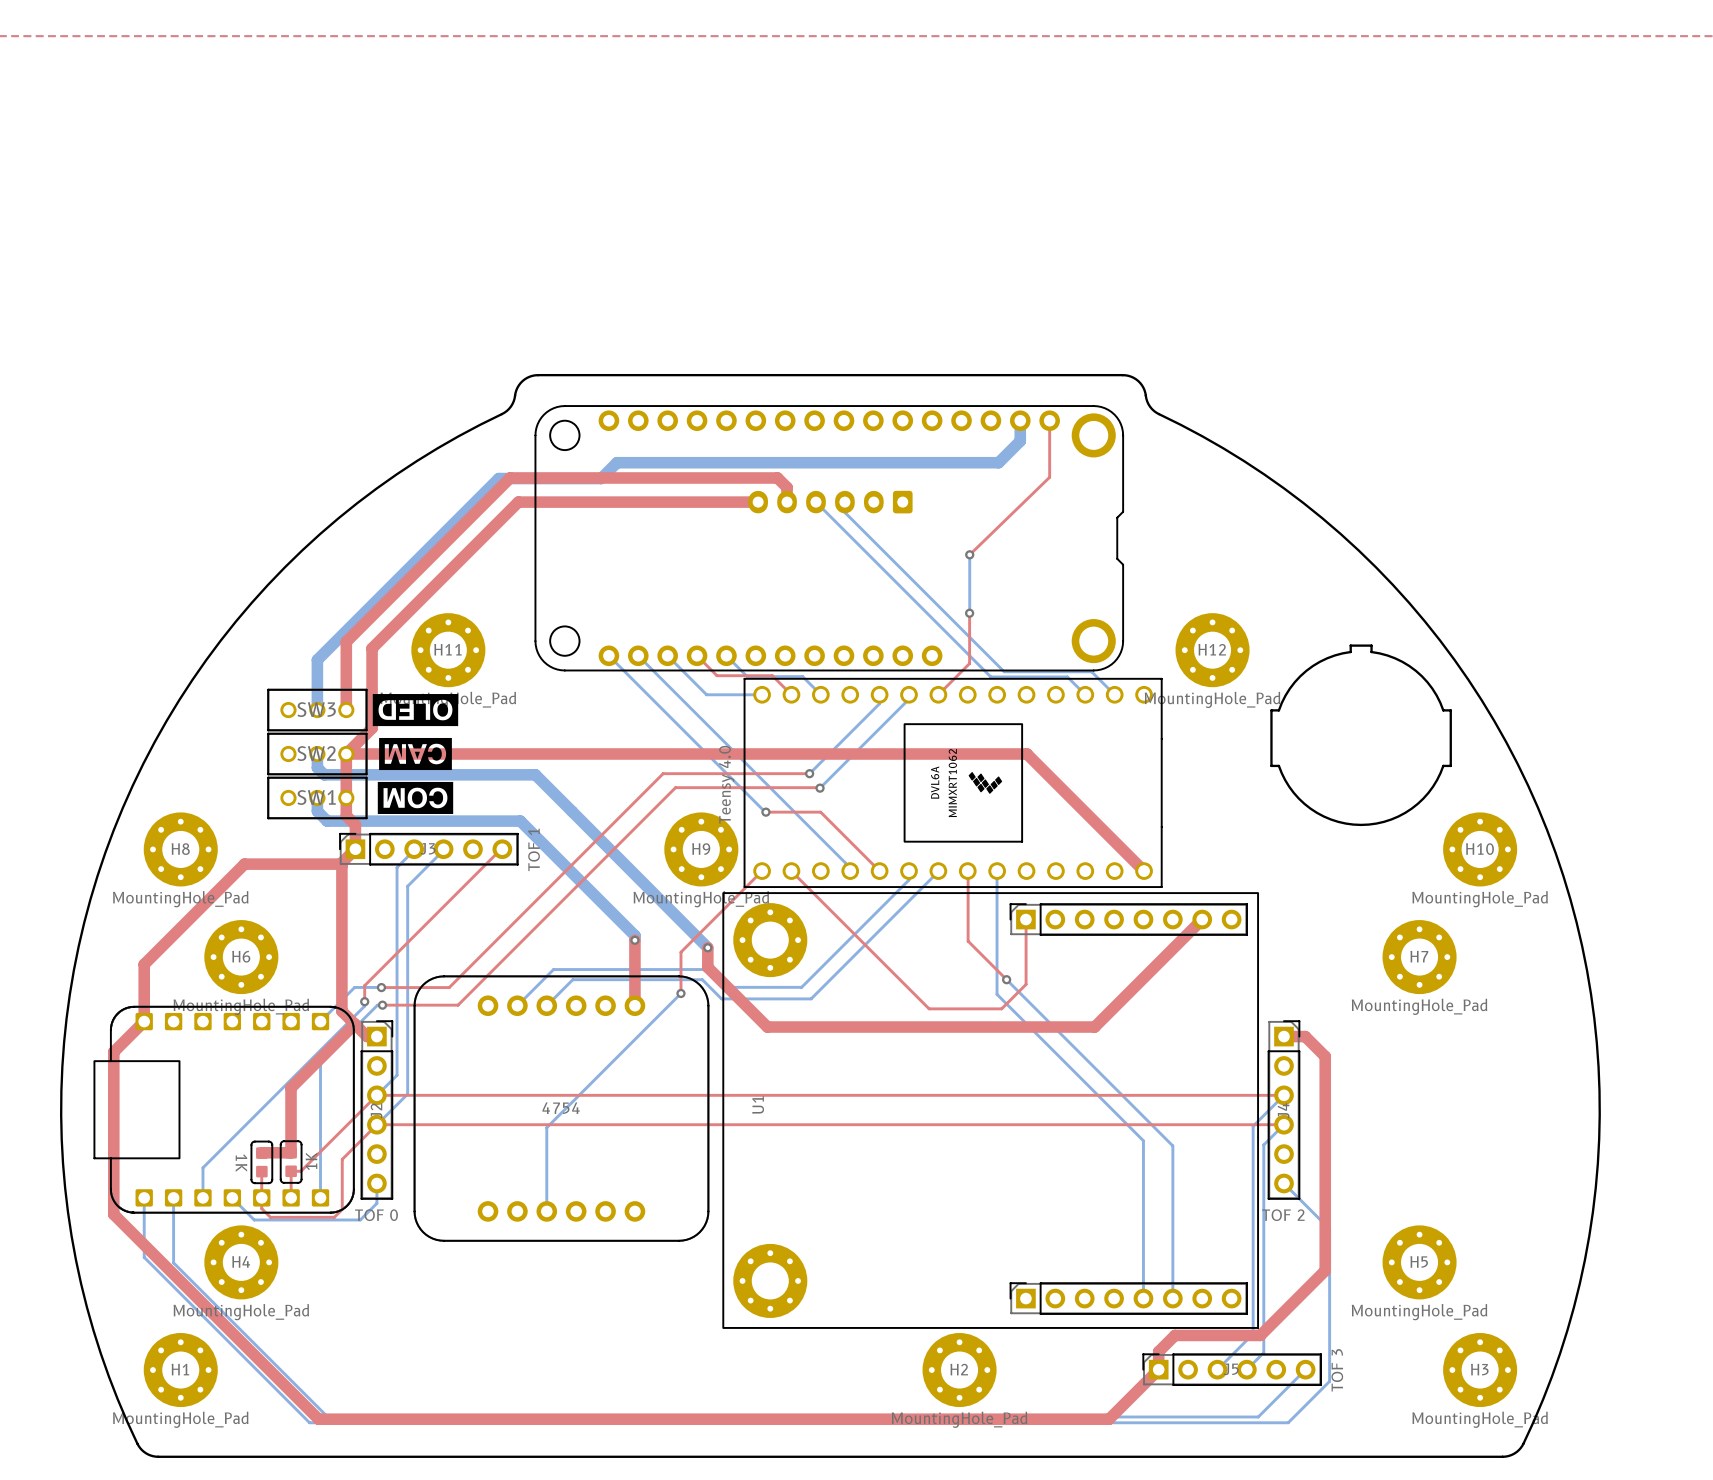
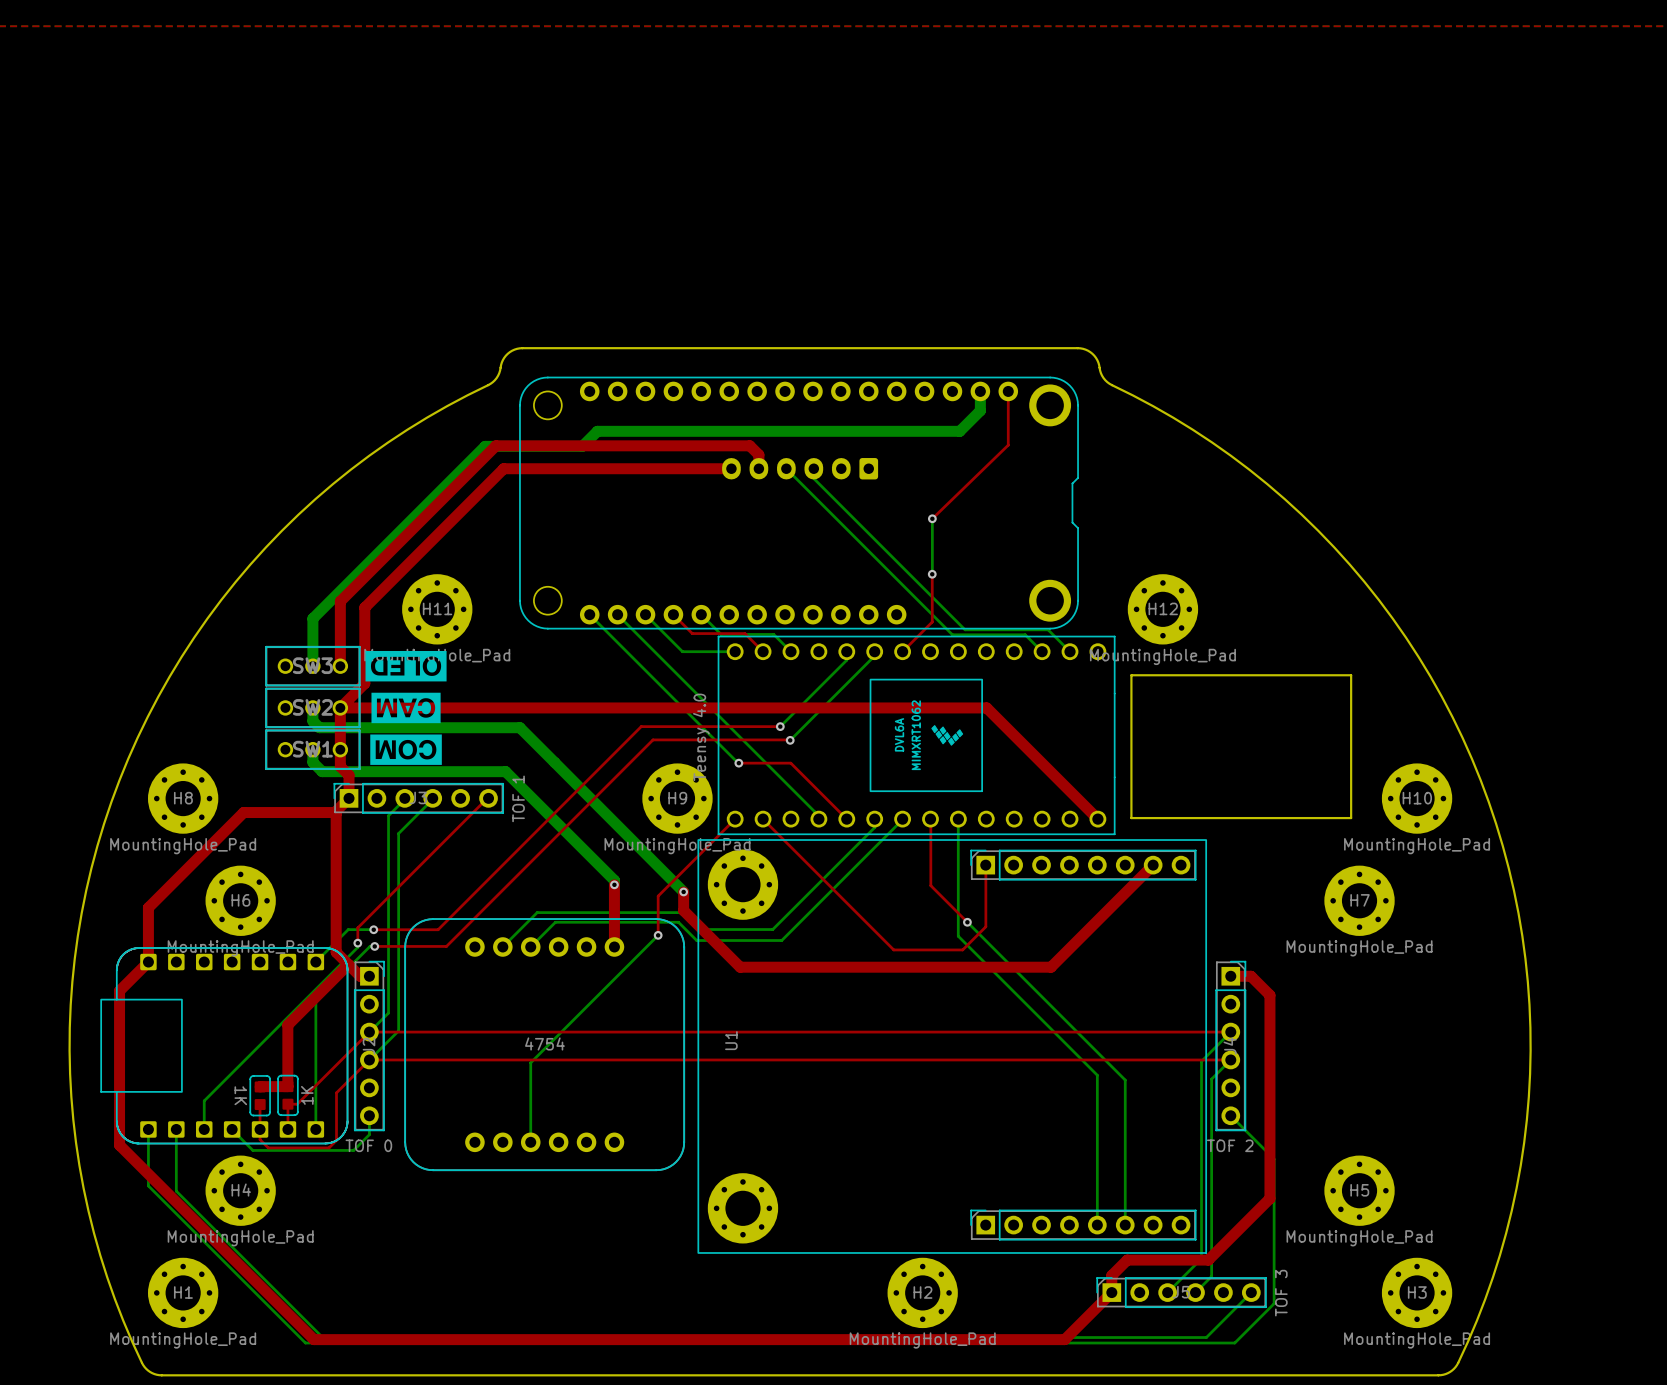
board edge: (1350, 645) (1350, 652) (1327, 658) (1306, 670) (1289, 688) (1278, 710) (1271, 710) (1271, 765) (1278, 765) (1293, 792) (1316, 812) (1345, 823) (1368, 824) (1391, 819) (1411, 808) (1433, 786) (1443, 765) (1450, 765) (1450, 710) (1443, 710) (1436, 695) (1427, 682) (1409, 666) (1395, 658) (1371, 652) (1371, 645) (1350, 645) -> none
board edge: none -> (1131, 675) (1131, 818) (1351, 818) (1351, 675) (1131, 675)

